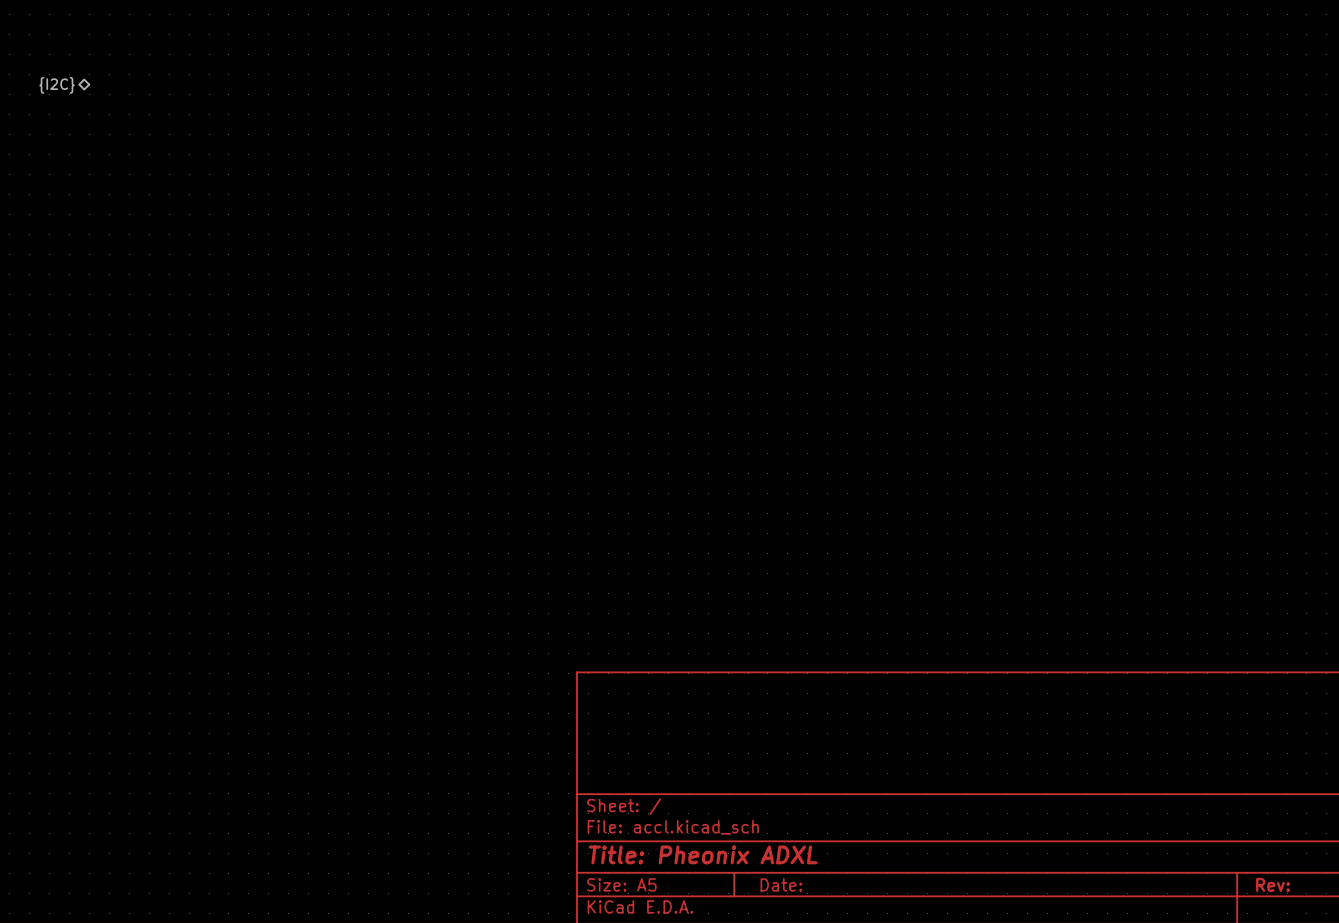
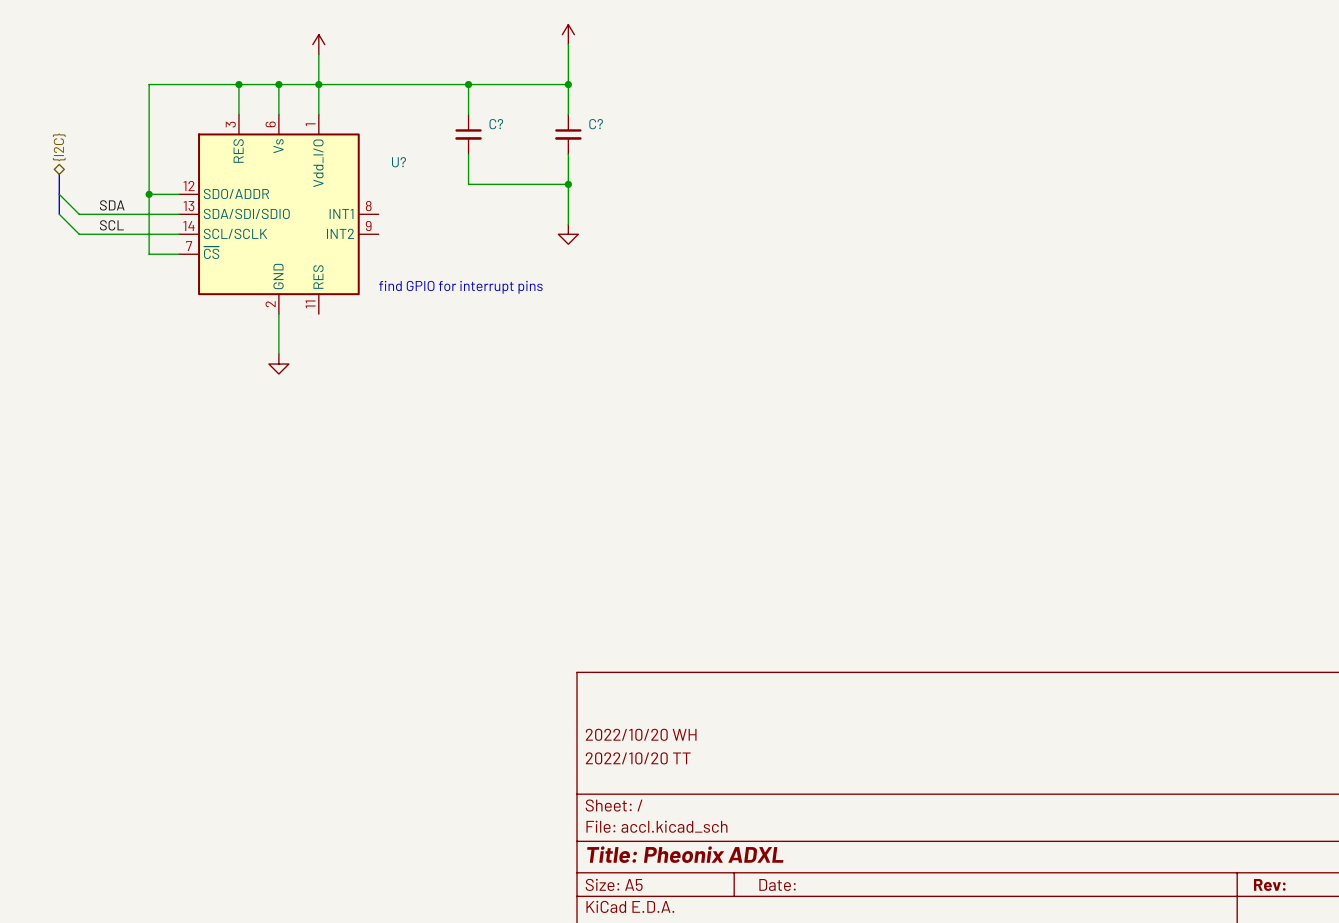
power symbol: none -> (568, 34)
power symbol: none -> (318, 44)
wire: none -> (568, 44) (568, 114)
wire: none -> (318, 54) (318, 114)
wire: none -> (238, 84) (238, 114)
junction: none -> (238, 84)
wire: none -> (278, 84) (278, 114)
junction: none -> (278, 84)
junction: none -> (318, 84)
wire: none -> (468, 84) (468, 114)
junction: none -> (468, 84)
wire: none -> (568, 84) (149, 84) (149, 254) (179, 254)
junction: none -> (568, 84)
hierarchical label rotation: 0° (57, 85) -> 90° clockwise (59, 147)
C?: none -> (468, 134)
C?: none -> (568, 134)
wire: none -> (468, 154) (468, 184) (568, 184)
wire: none -> (568, 154) (568, 224)
bus: none -> (59, 174) (59, 214)
junction: none -> (568, 184)
wire: none -> (59, 194) (79, 214) (179, 214)
wire: none -> (149, 194) (179, 194)
junction: none -> (149, 194)
label: none -> SDA (112, 205)
wire: none -> (59, 214) (79, 234) (179, 234)
U?: none -> (278, 214)
label: none -> SCL (111, 225)
power symbol: none -> (568, 234)
text: none -> find GPIO for interrupt pins (460, 287)
wire: none -> (278, 314) (278, 354)
power symbol: none -> (278, 364)
title block: none -> 2022/10/20 WH (641, 734)
title block: none -> 2022/10/20 TT (638, 758)

